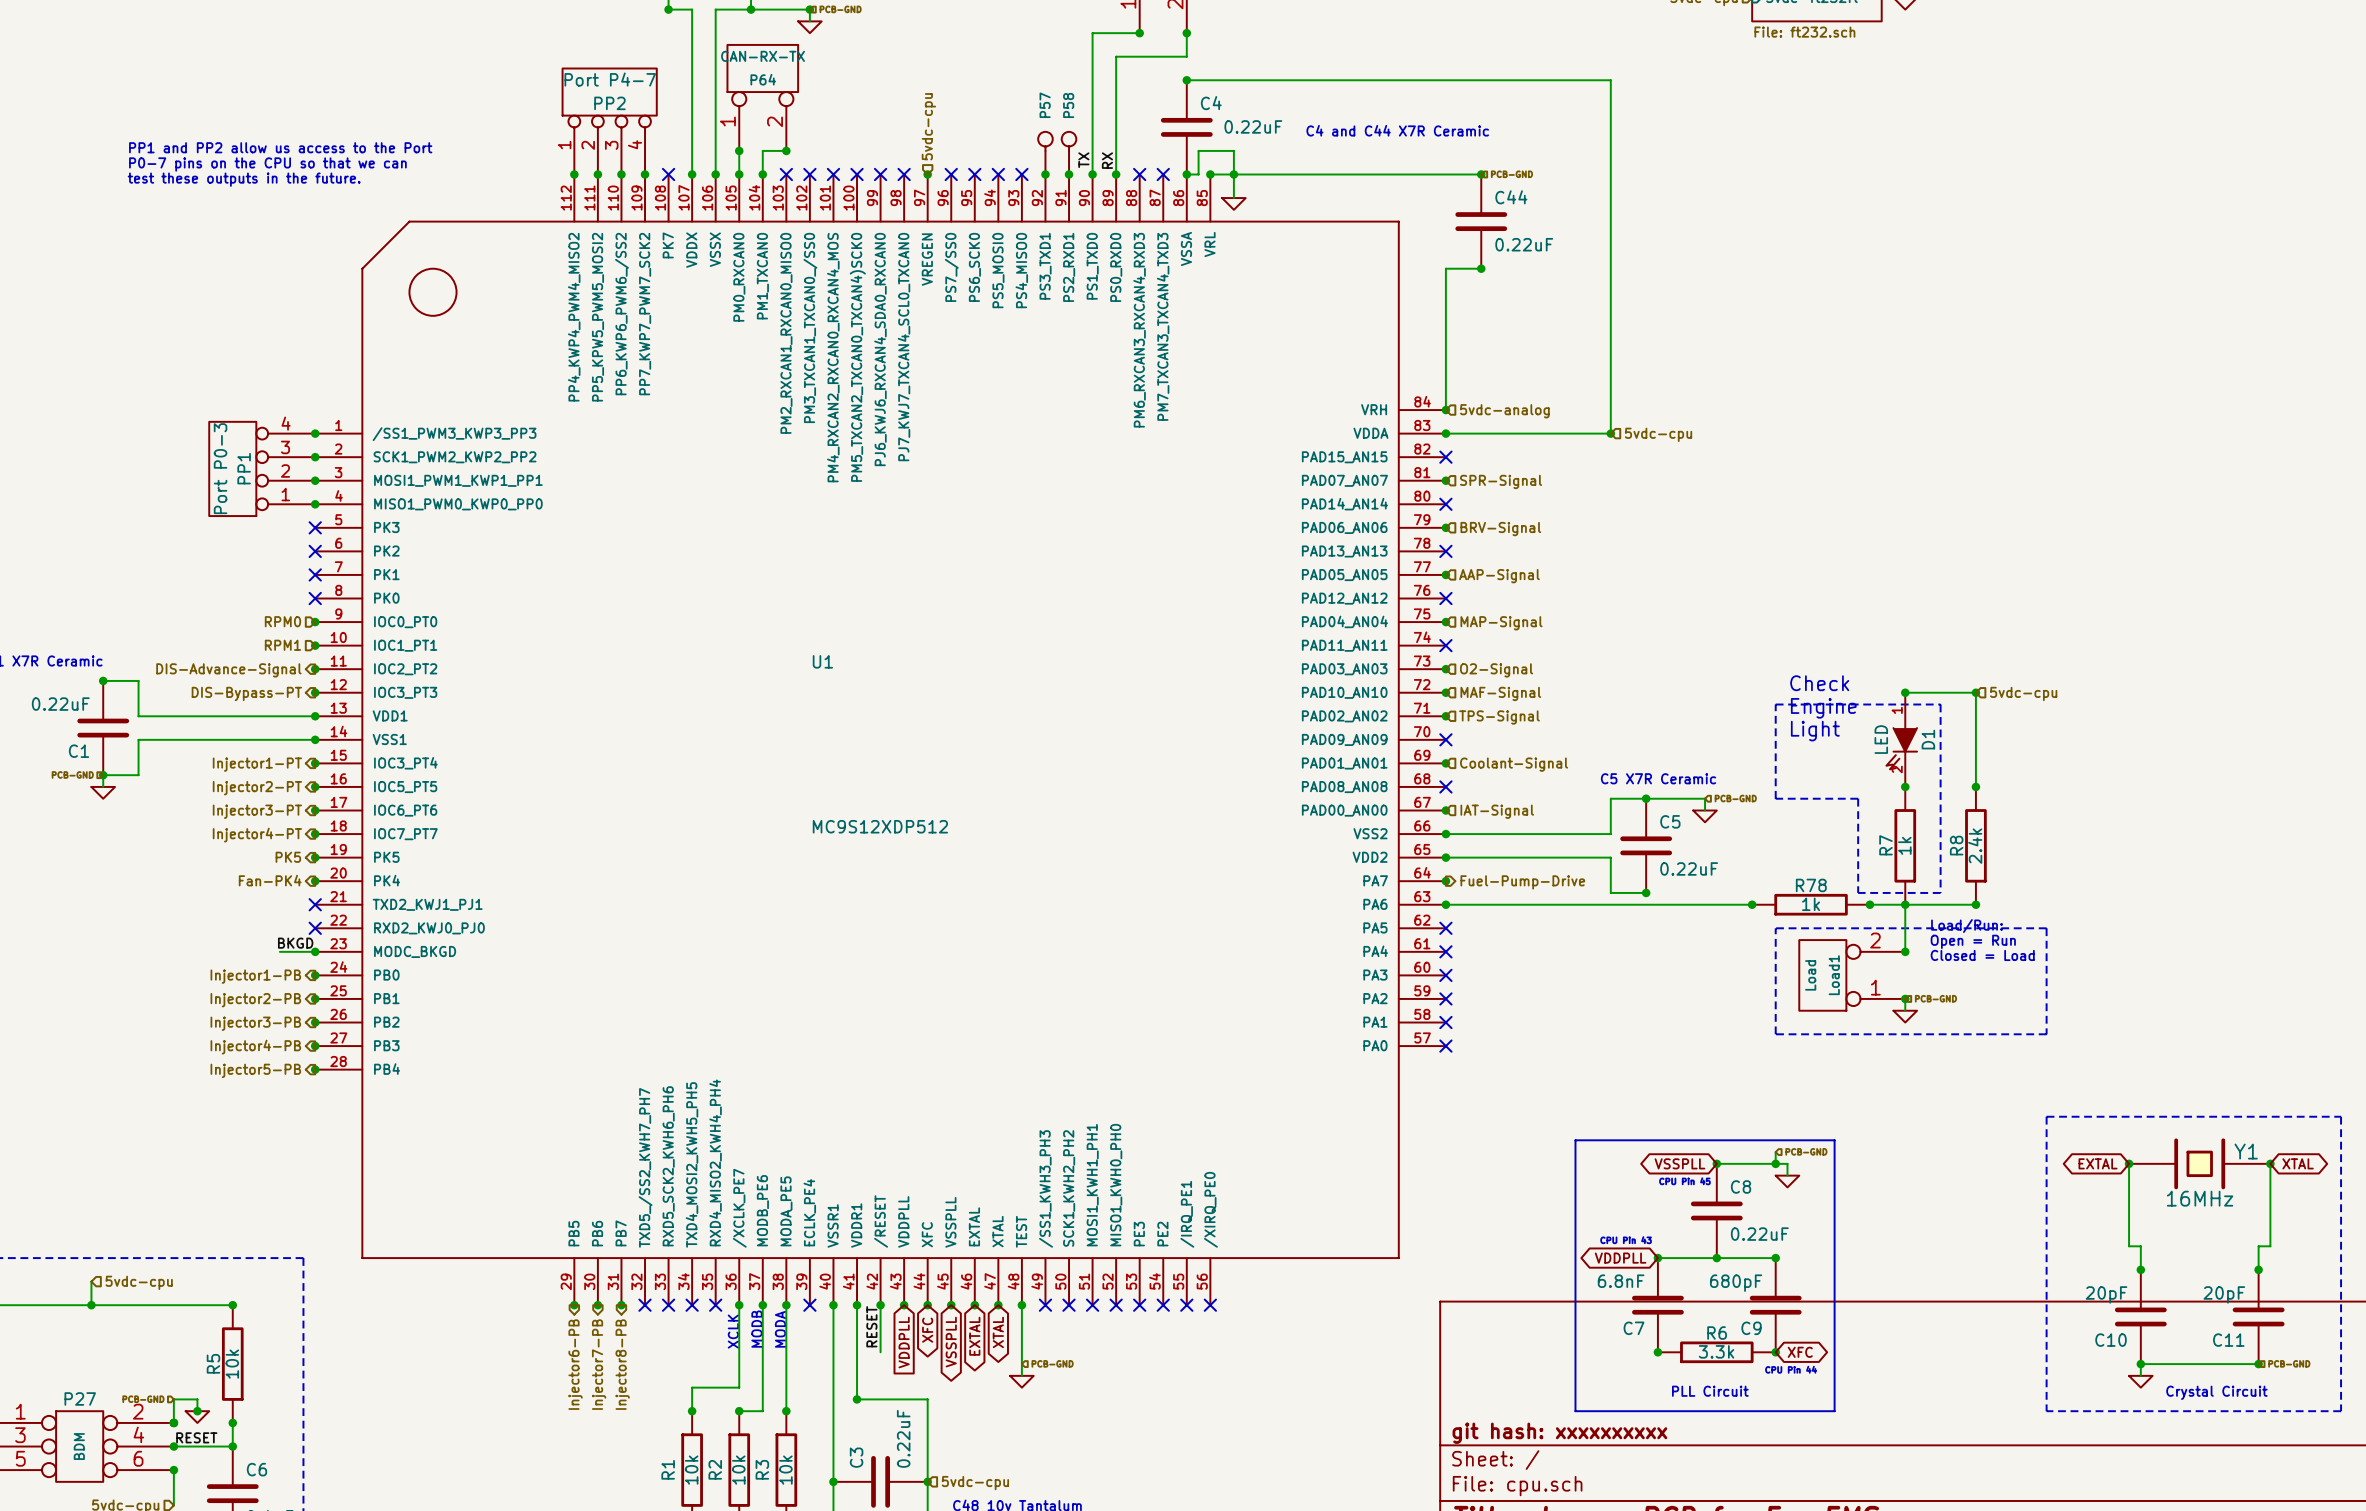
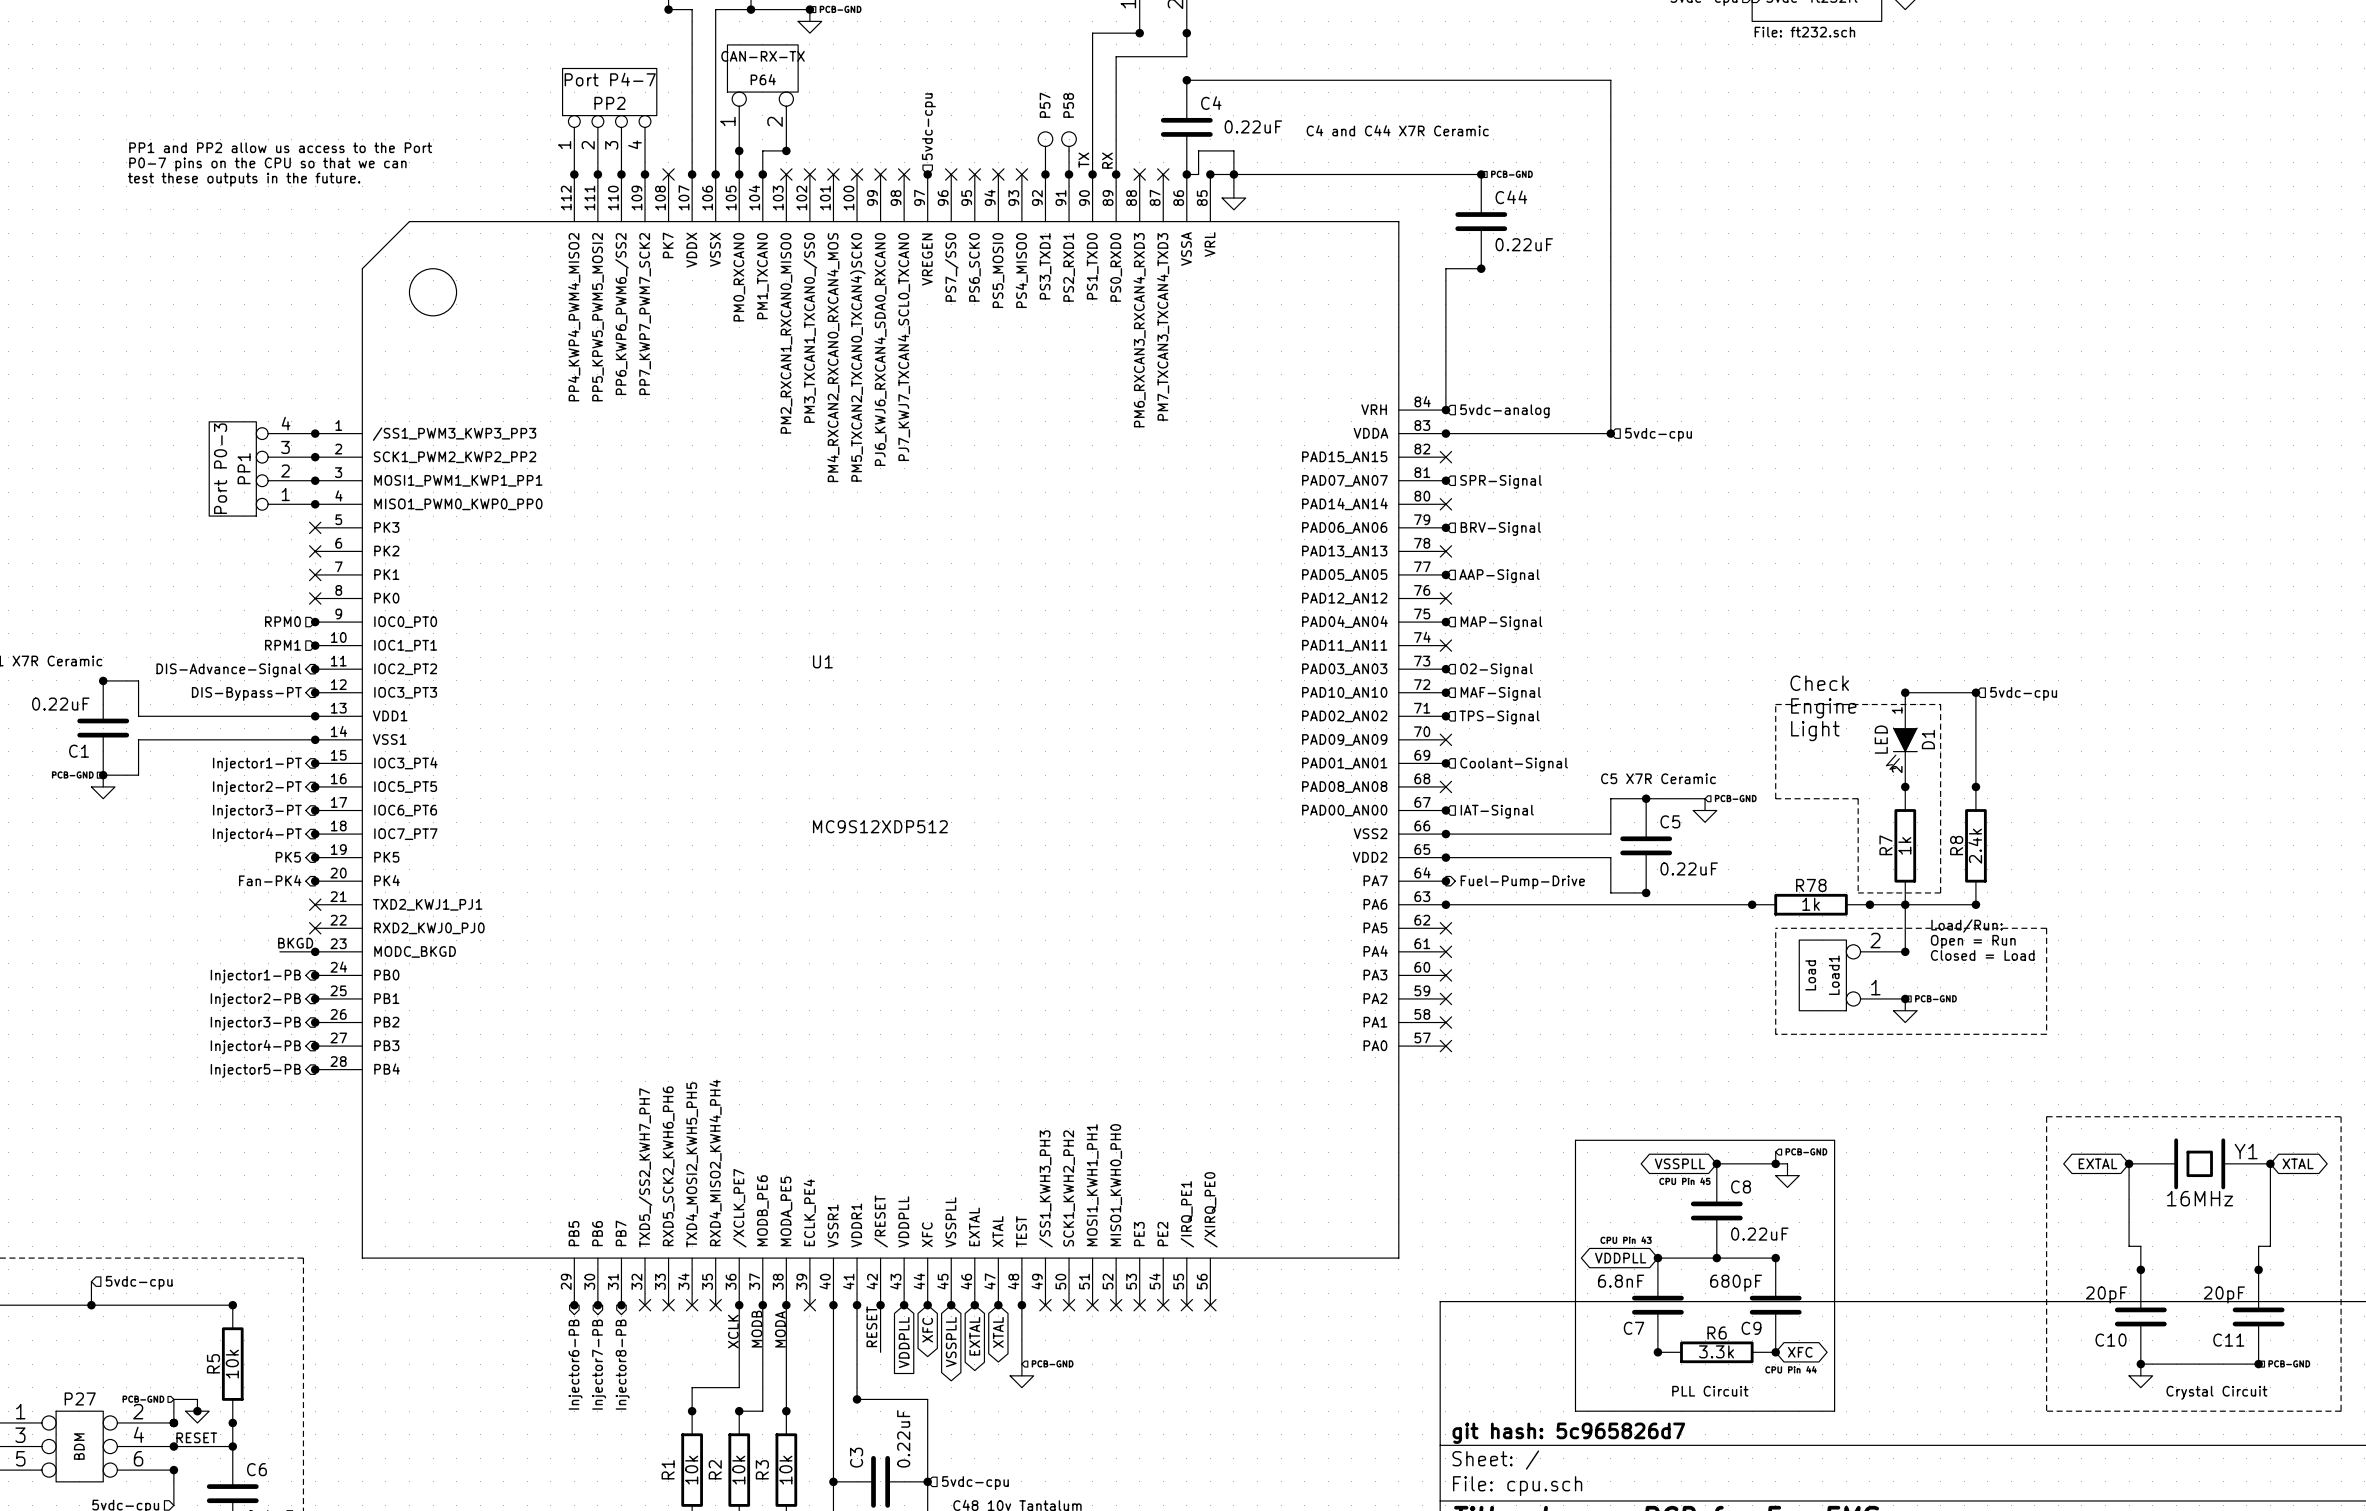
title block: git hash: xxxxxxxxxx (1559, 1433) -> git hash: 5c965826d7 (1568, 1433)

